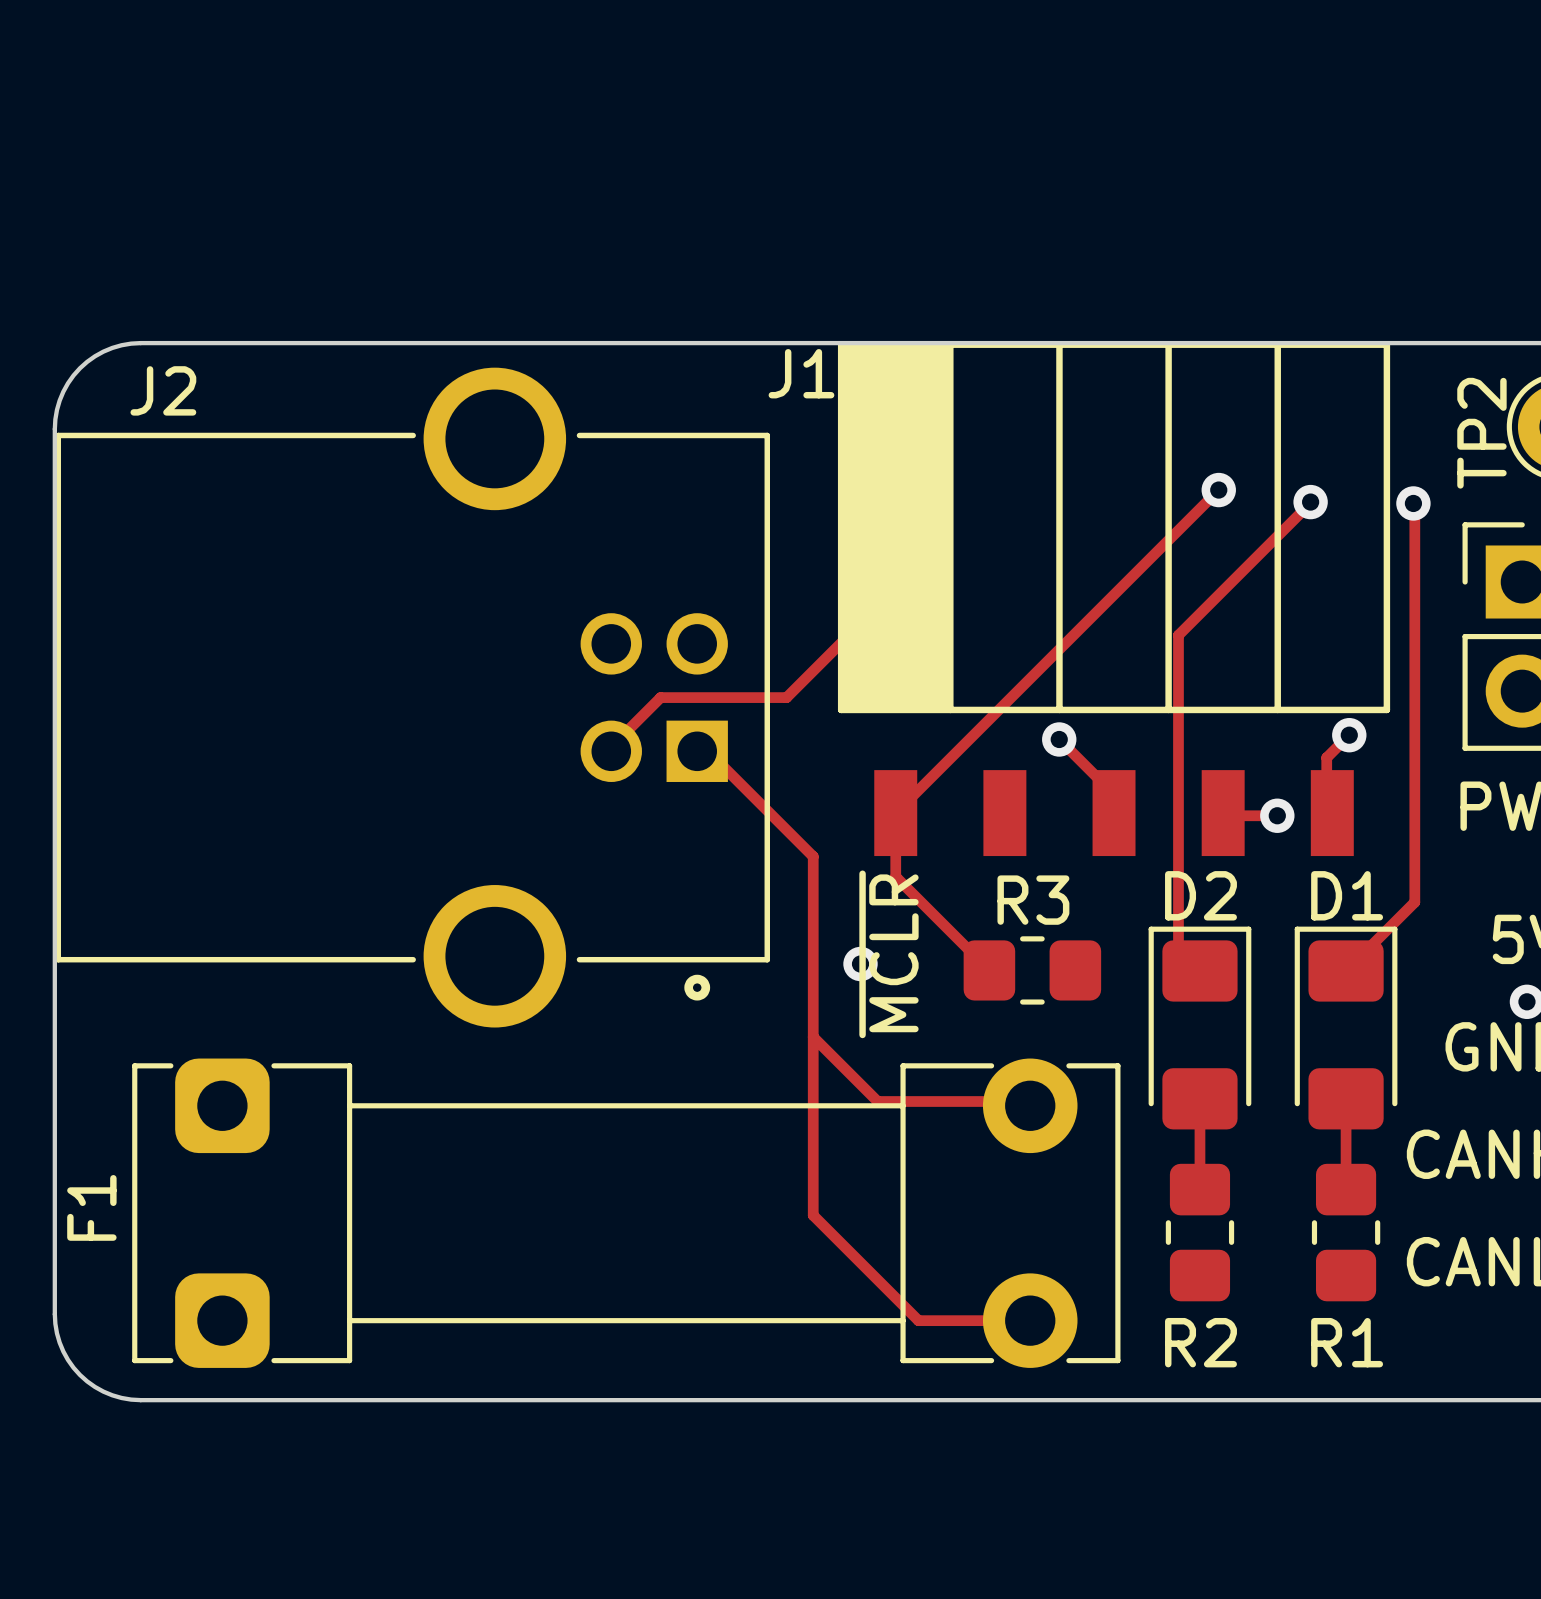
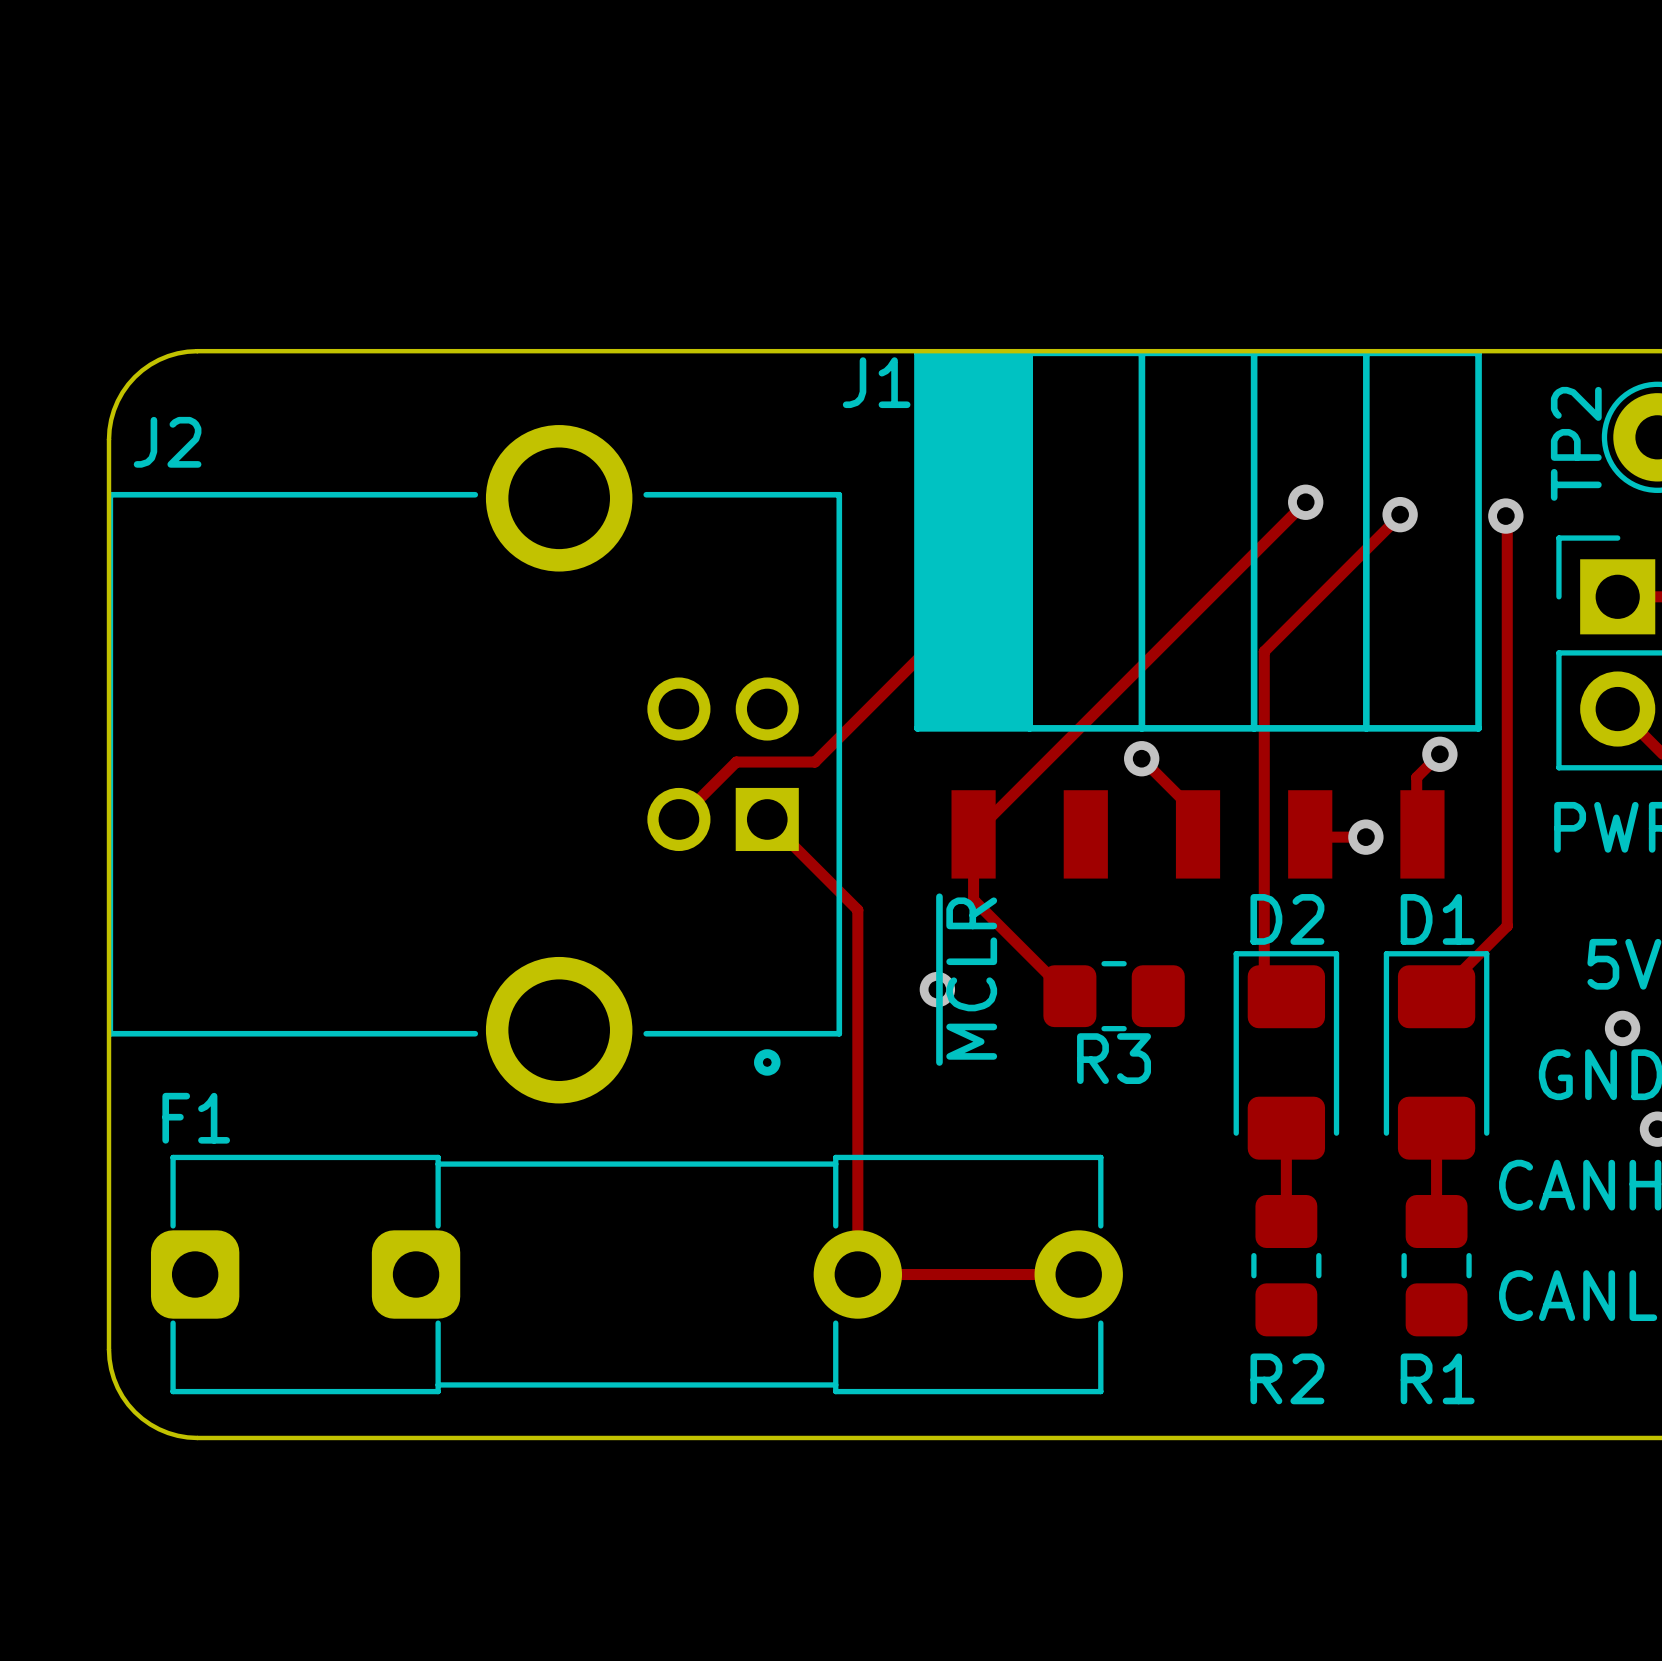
J2 name position: J2 (163, 390) -> J2 (167, 442)
J2 position: (412, 697) -> (474, 764)
track: (786, 697) (660, 697) (611, 747) (611, 751) -> (861, 715) (814, 762) (736, 762) (678, 819)
track: (697, 751) (707, 751) (813, 856) (813, 1215) (918, 1320) (1030, 1320) -> none
track: none -> (767, 819) (857, 910) (857, 1274) (1078, 1274)
R3 name position: R3 (1033, 900) -> R3 (1114, 1058)
track: (813, 1037) (877, 1101) (1025, 1101) (1030, 1105) -> none
F1 footprint: [132, 1058, 1121, 1368] -> [150, 1154, 1123, 1395]
F1 name position: F1 (91, 1207) -> F1 (196, 1118)

